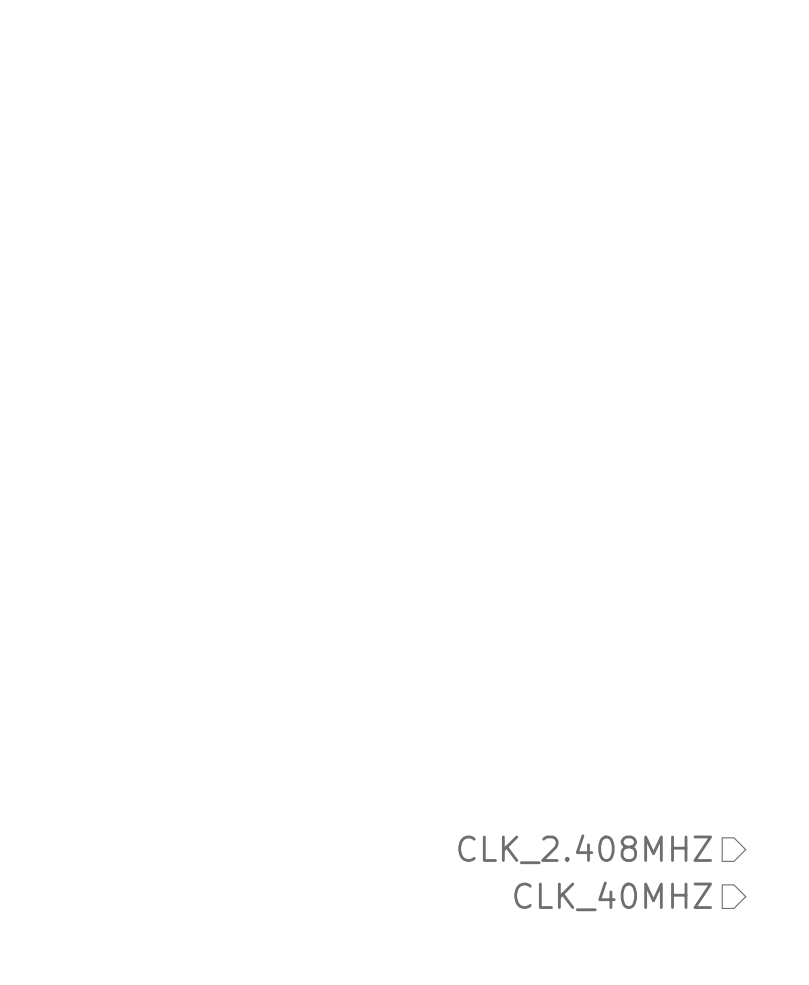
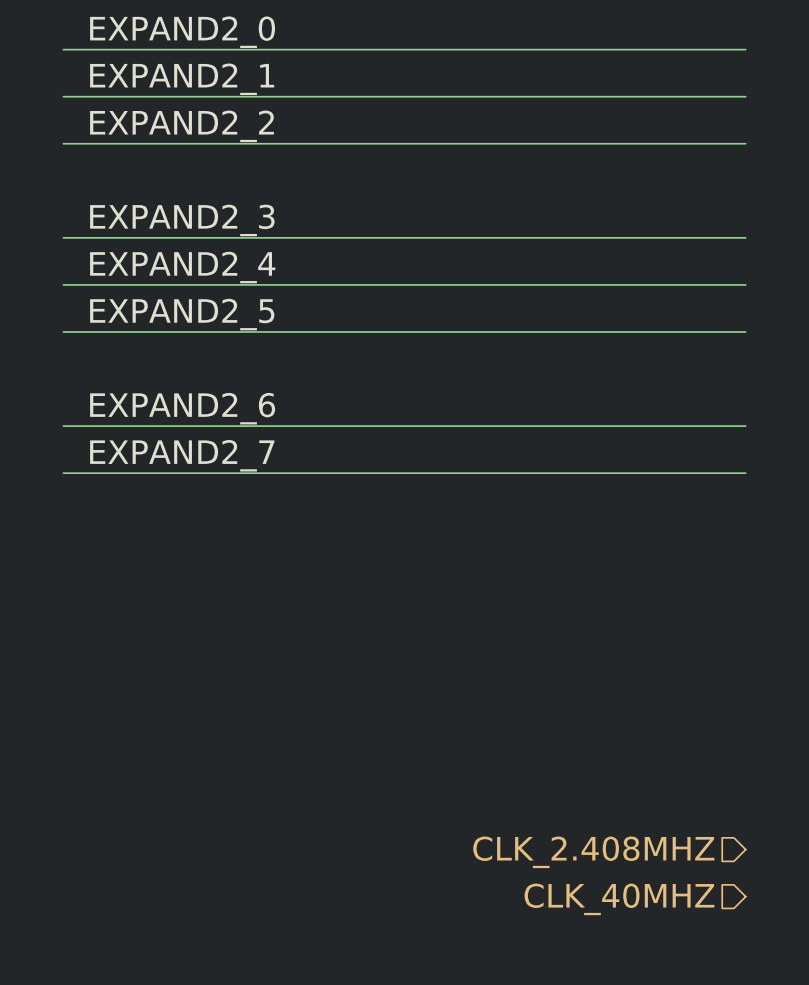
label: none -> EXPAND2_0 (182, 32)
wire: none -> (63, 49) (745, 49)
label: none -> EXPAND2_1 (182, 79)
wire: none -> (63, 96) (745, 96)
label: none -> EXPAND2_2 (182, 126)
wire: none -> (63, 143) (745, 143)
label: none -> EXPAND2_3 (182, 220)
wire: none -> (63, 237) (745, 237)
label: none -> EXPAND2_4 (182, 267)
wire: none -> (63, 284) (745, 284)
label: none -> EXPAND2_5 (182, 314)
wire: none -> (63, 331) (745, 331)
label: none -> EXPAND2_6 (182, 408)
wire: none -> (63, 426) (745, 426)
label: none -> EXPAND2_7 (182, 455)
wire: none -> (63, 473) (745, 473)

